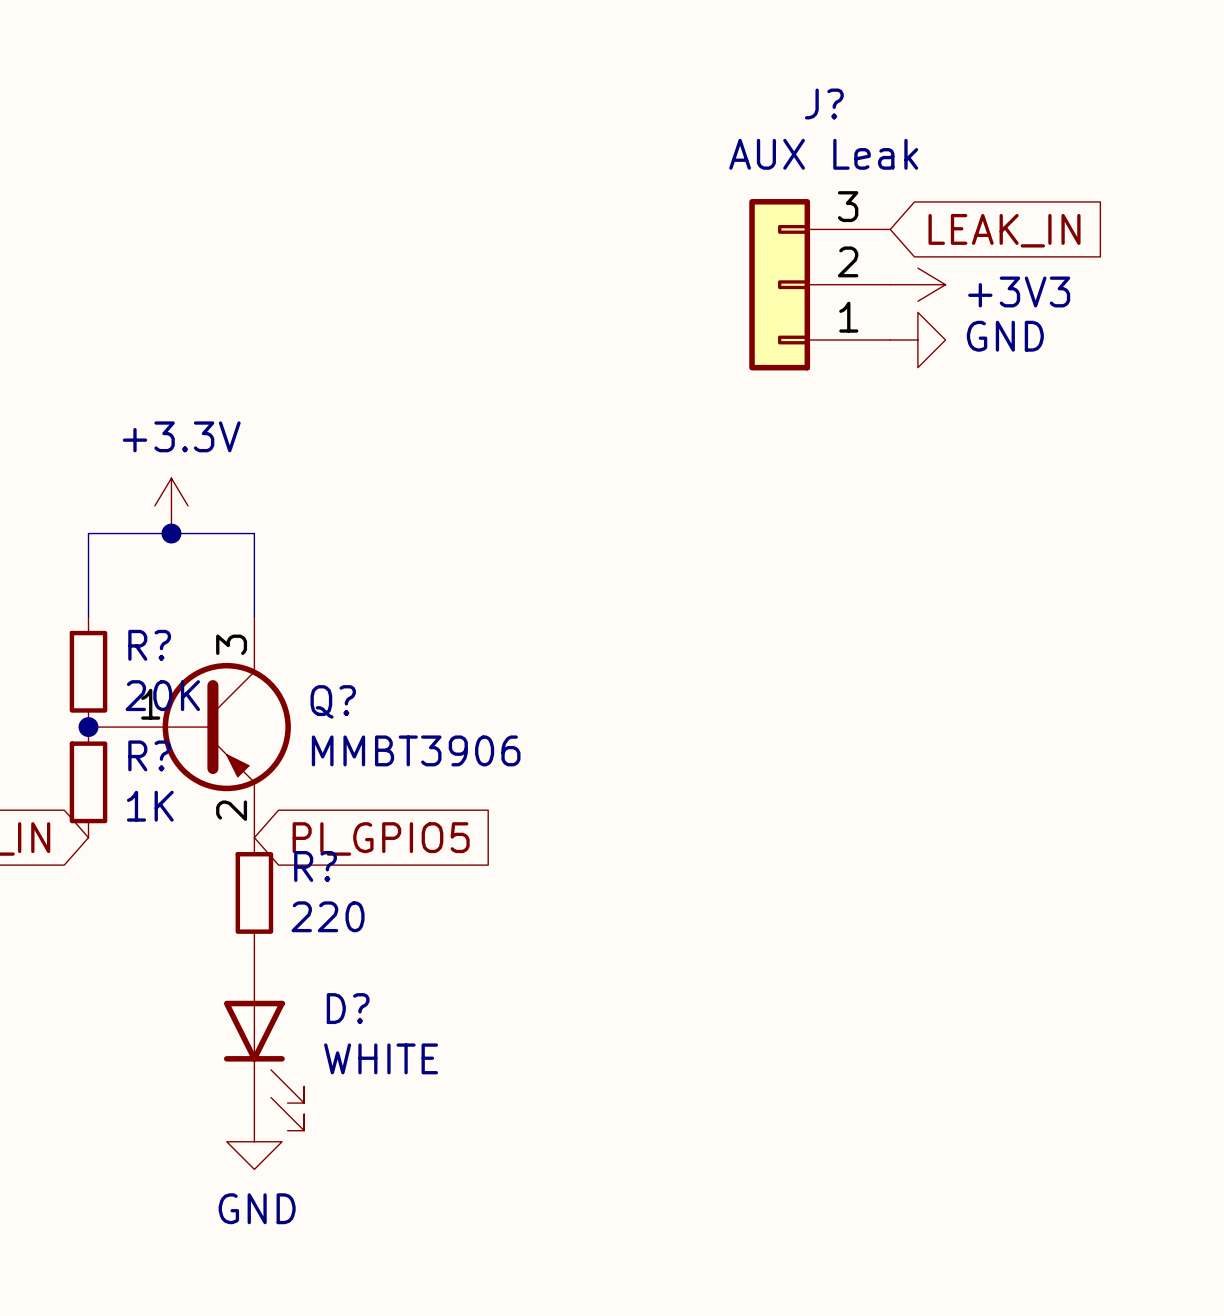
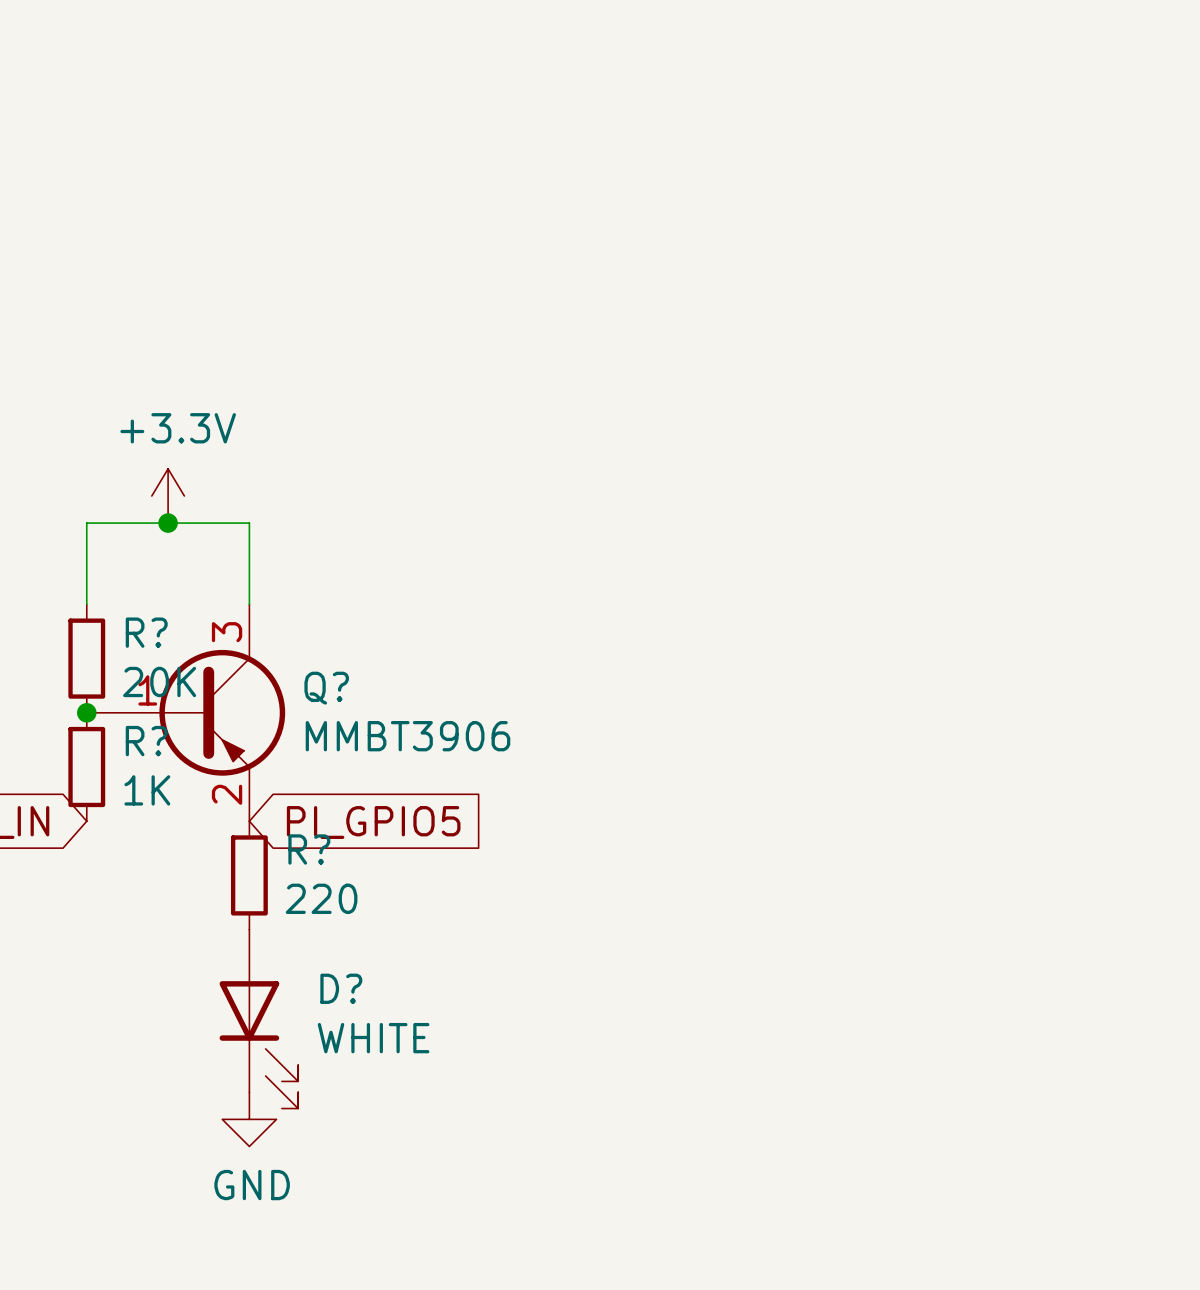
global label: LEAK_IN (1004, 230) -> none
J?: AUX Leak (819, 284) -> none
power symbol: +3V3 (917, 284) -> none
power symbol: GND (917, 340) -> none

